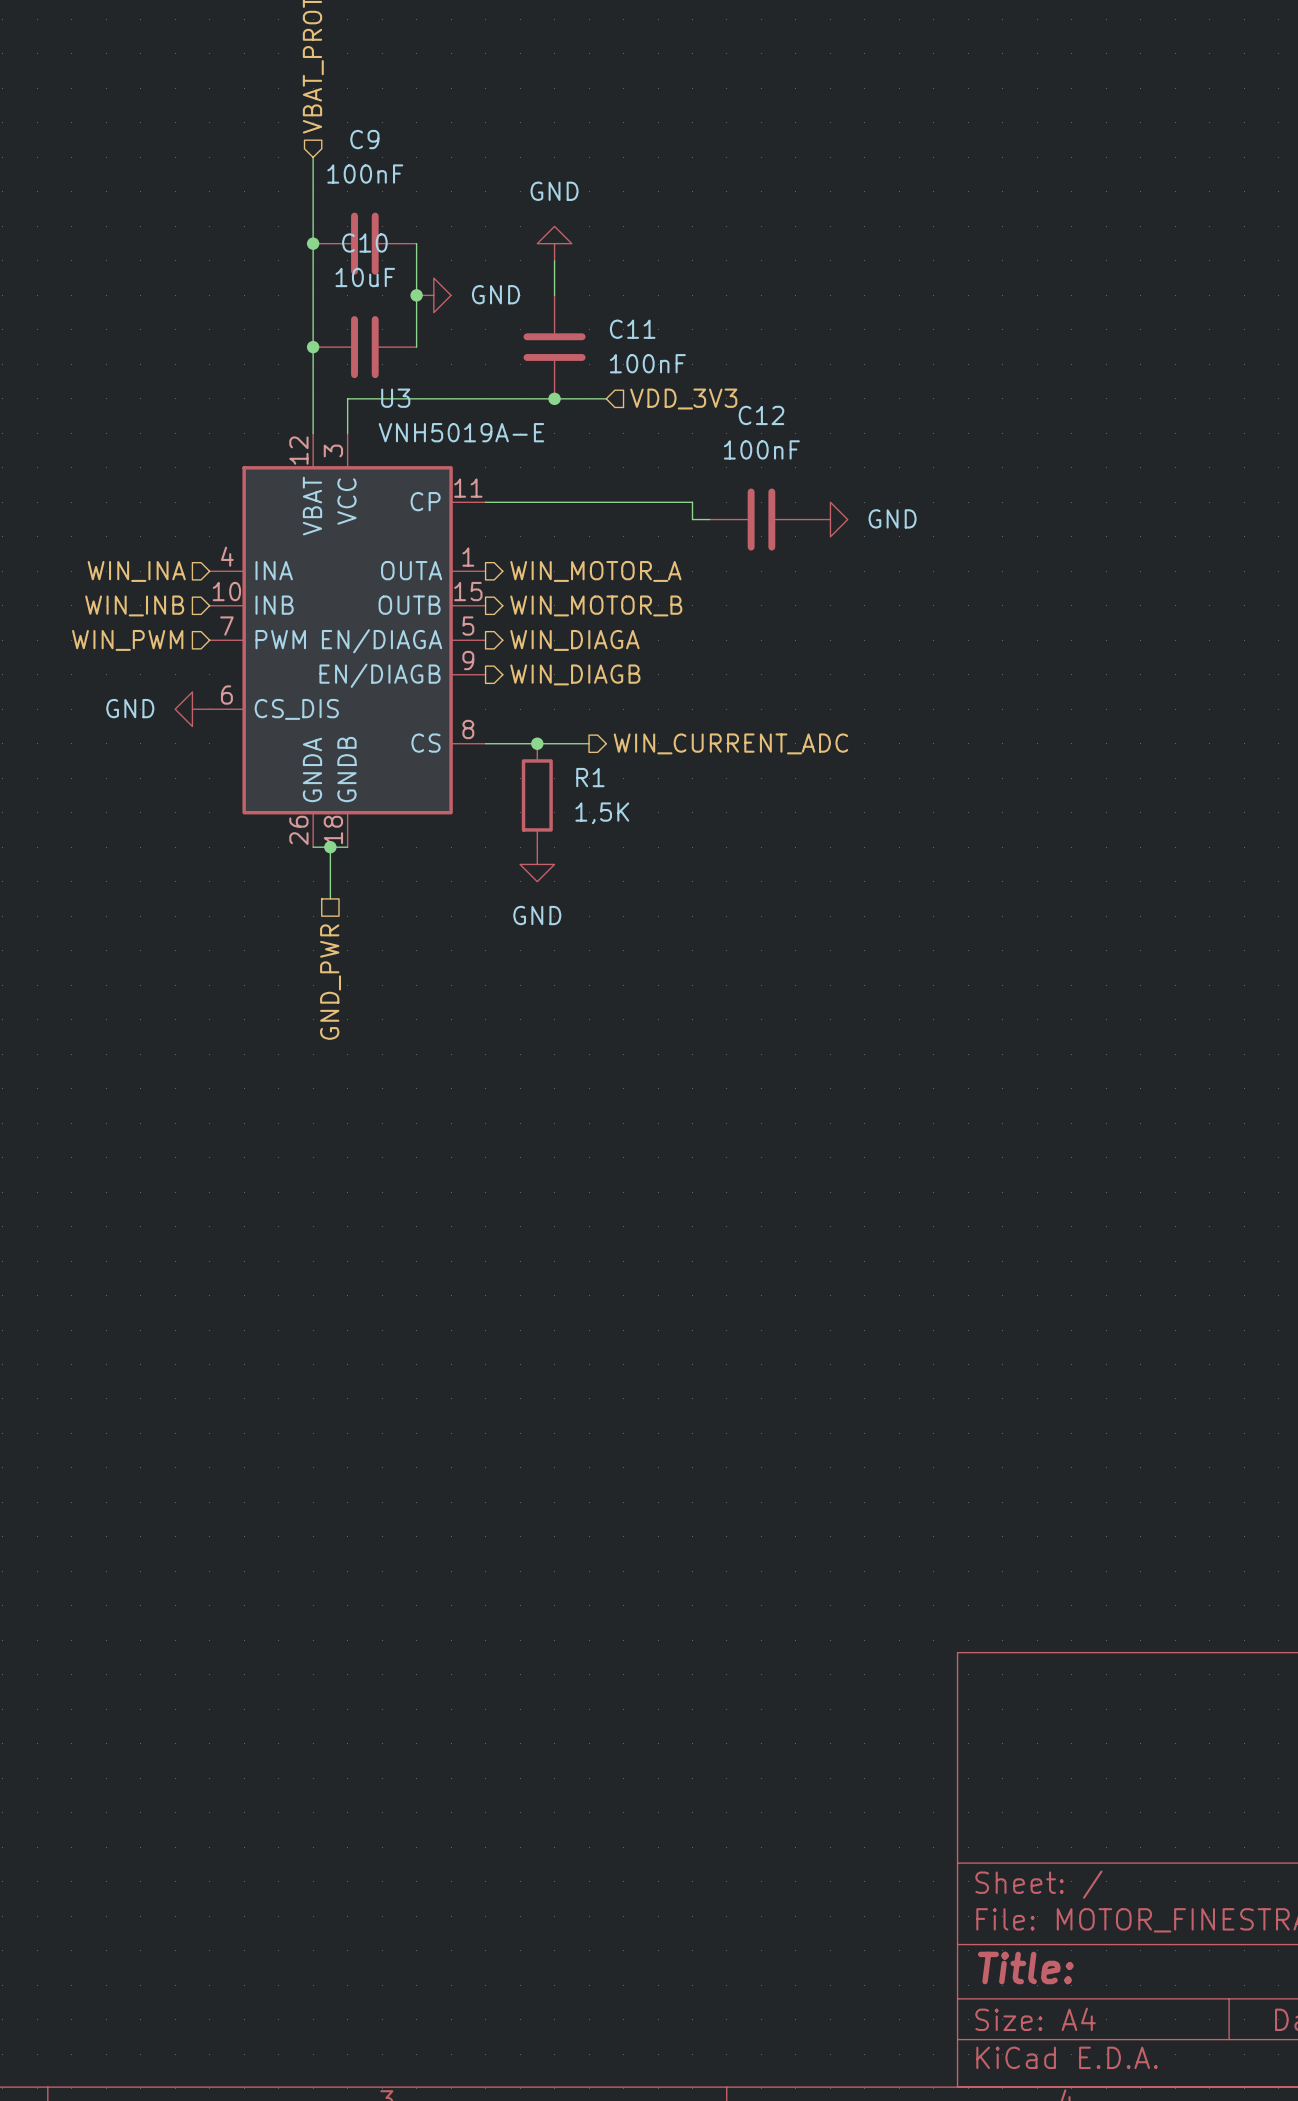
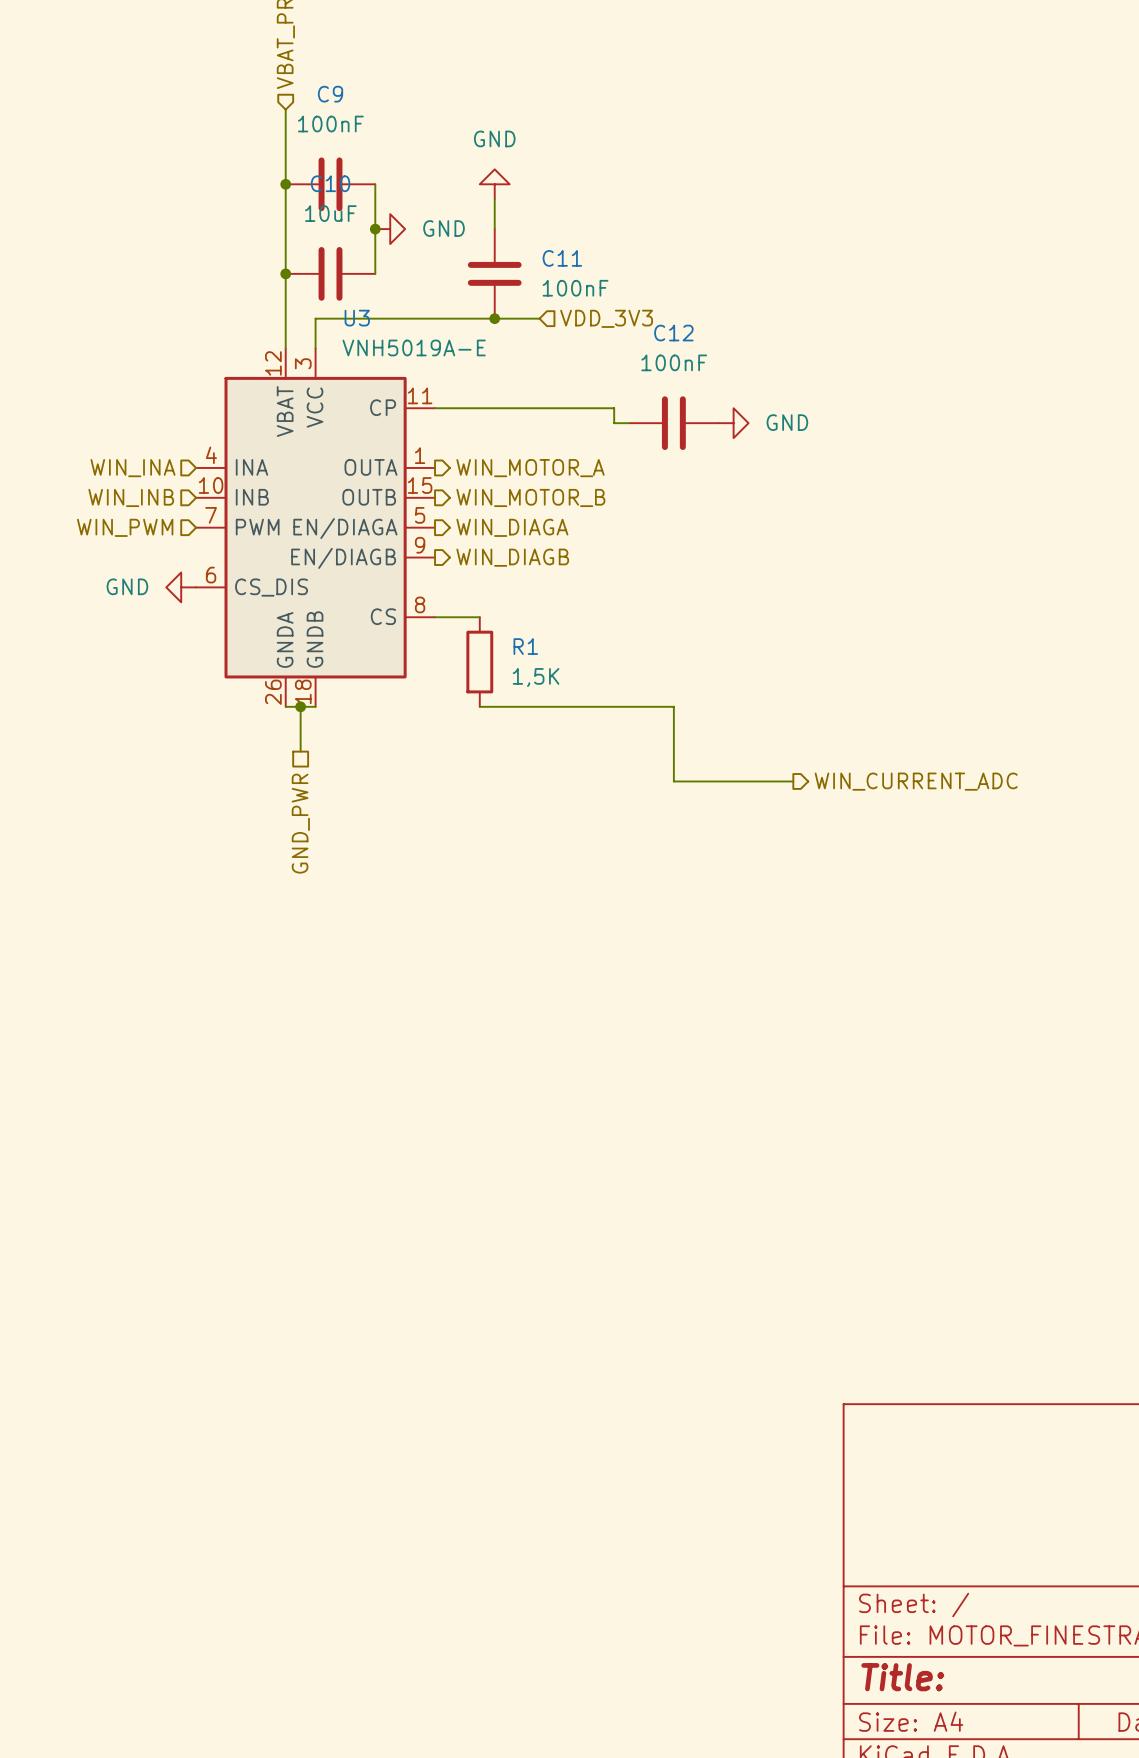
wire: (537, 743) (589, 743) -> none
junction: (537, 743) -> none
hierarchical label: WIN_CURRENT_ADC (730, 743) -> none
wire: none -> (479, 706) (673, 706) (673, 781) (793, 781)
power symbol: GND (537, 864) -> none
hierarchical label: none -> WIN_CURRENT_ADC (916, 781)

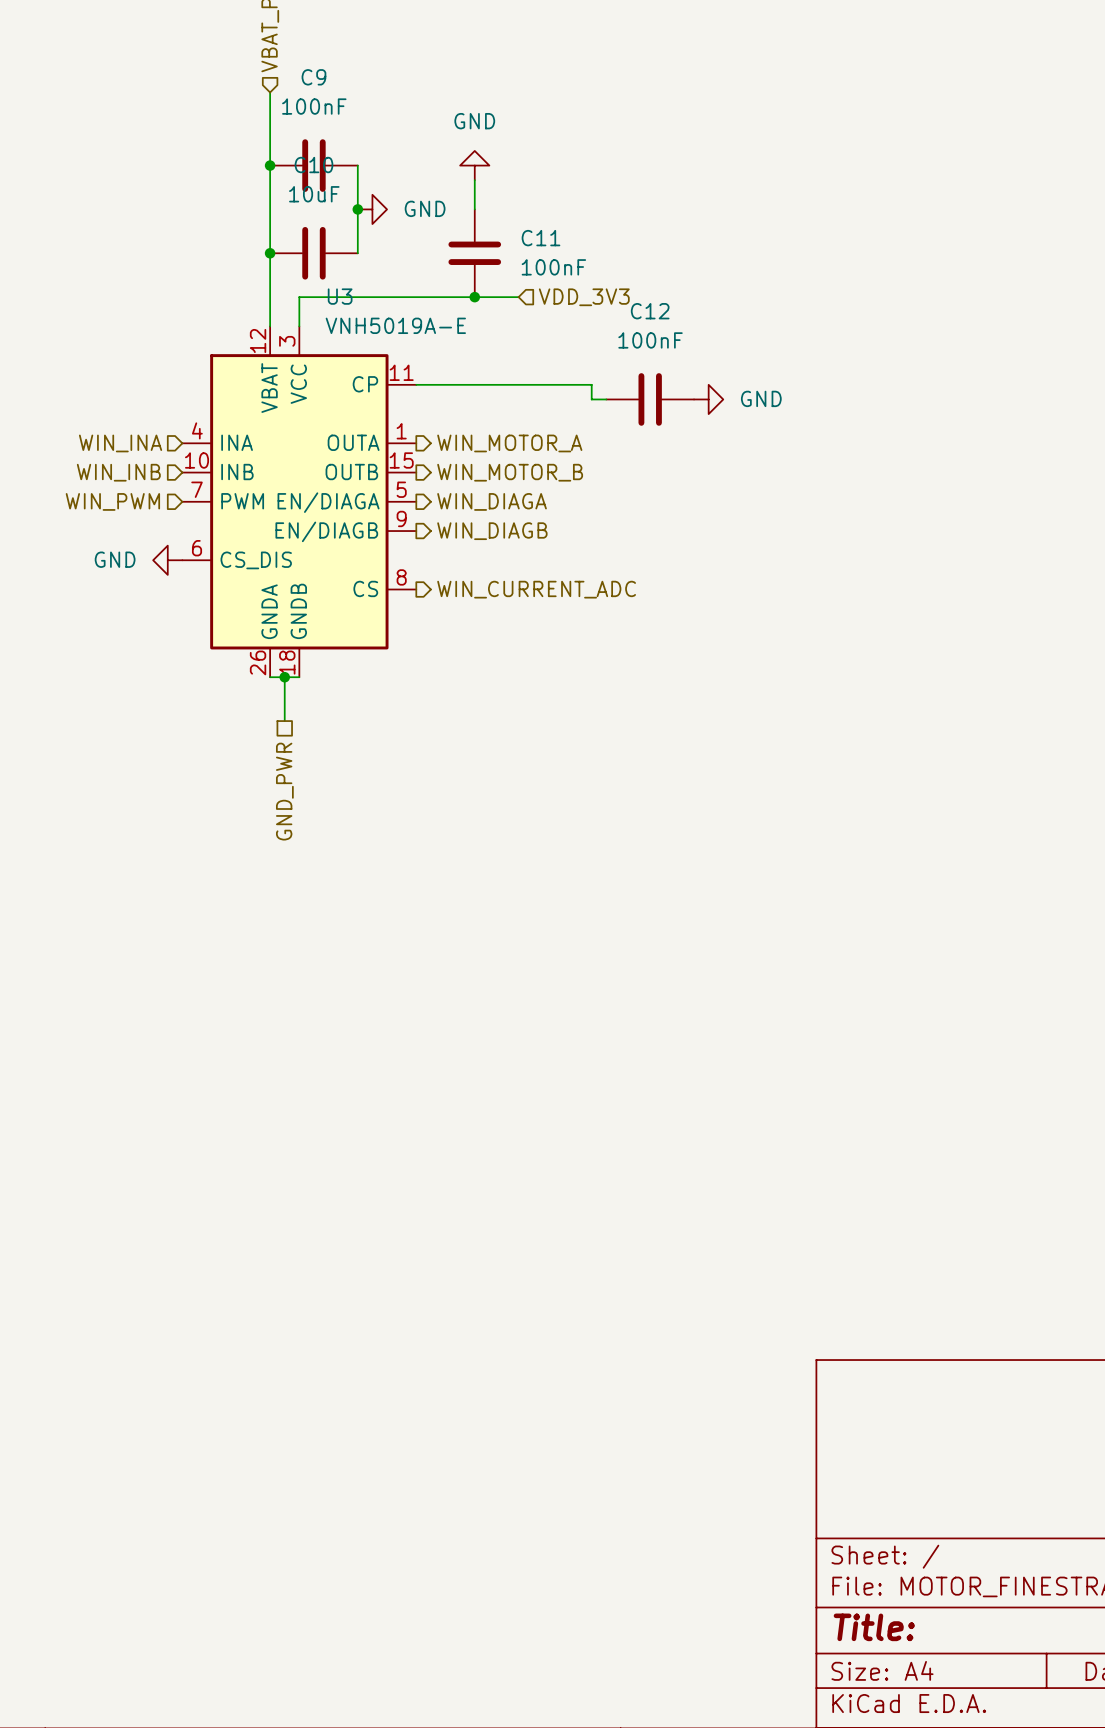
wire: (435, 617) (479, 617) -> none
hierarchical label: none -> WIN_CURRENT_ADC (536, 589)
R1: 1,5K (479, 662) -> none
wire: (479, 706) (673, 706) (673, 781) (793, 781) -> none
hierarchical label: WIN_CURRENT_ADC (916, 781) -> none

